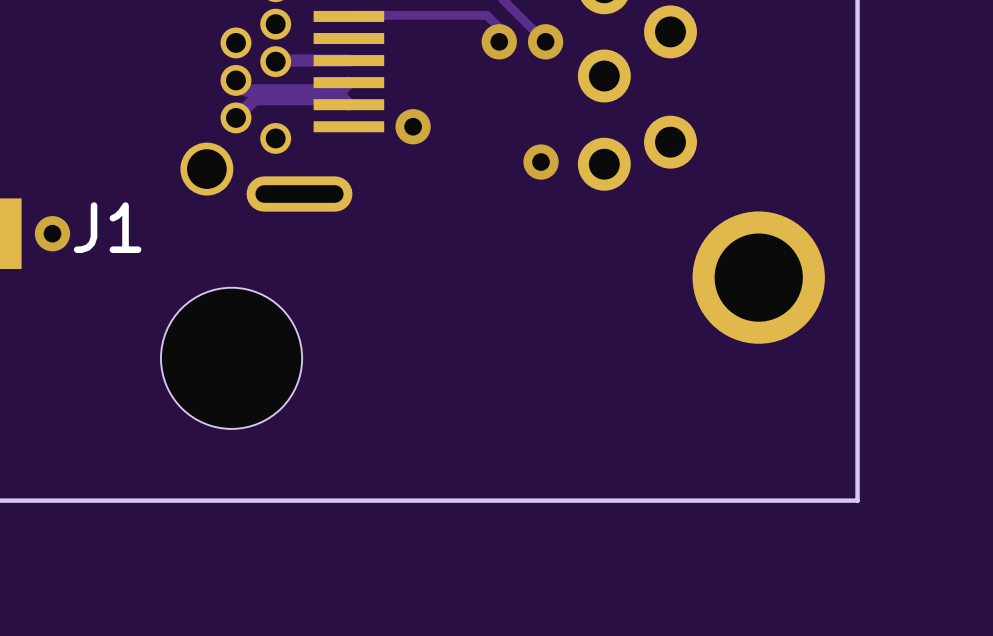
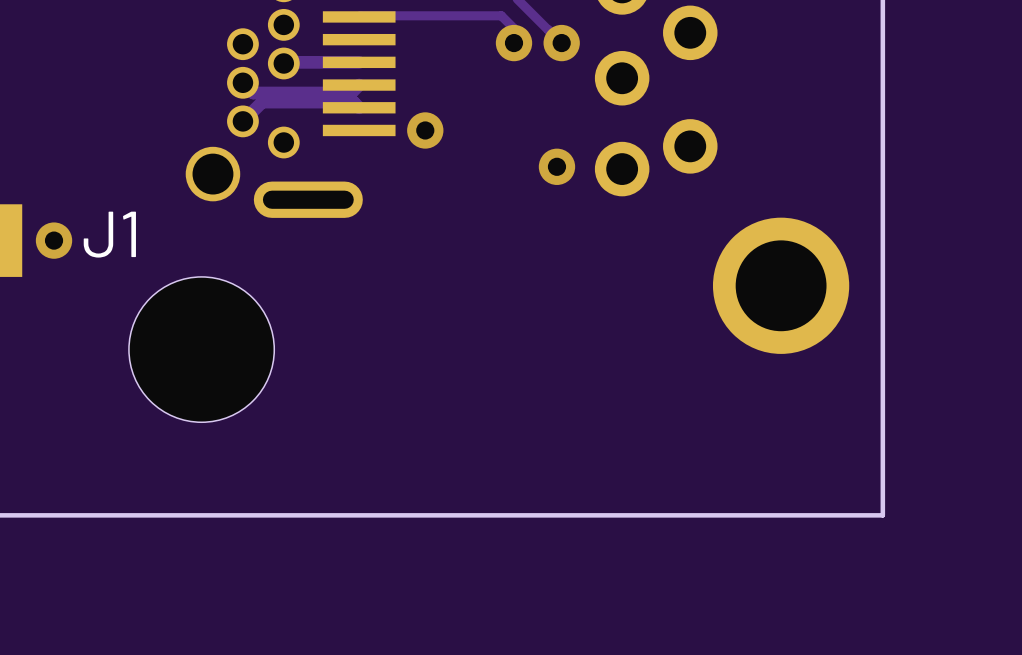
part position: (231, 358) -> (201, 349)

